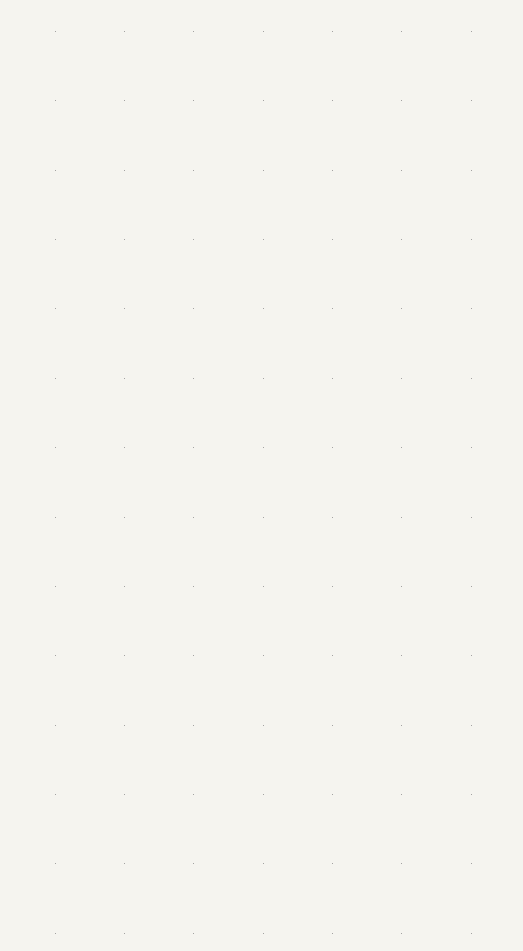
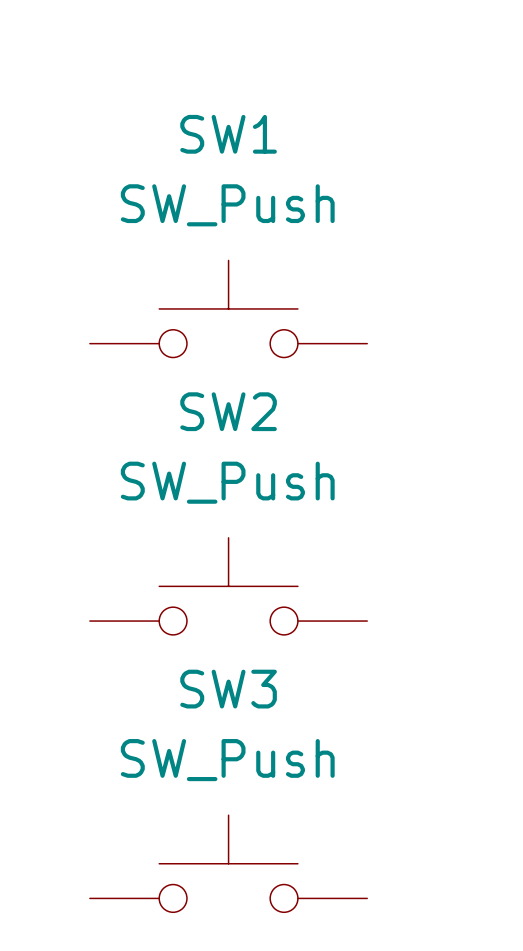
SW1: none -> SW_Push (228, 308)
SW2: none -> SW_Push (228, 586)
SW3: none -> SW_Push (228, 863)

